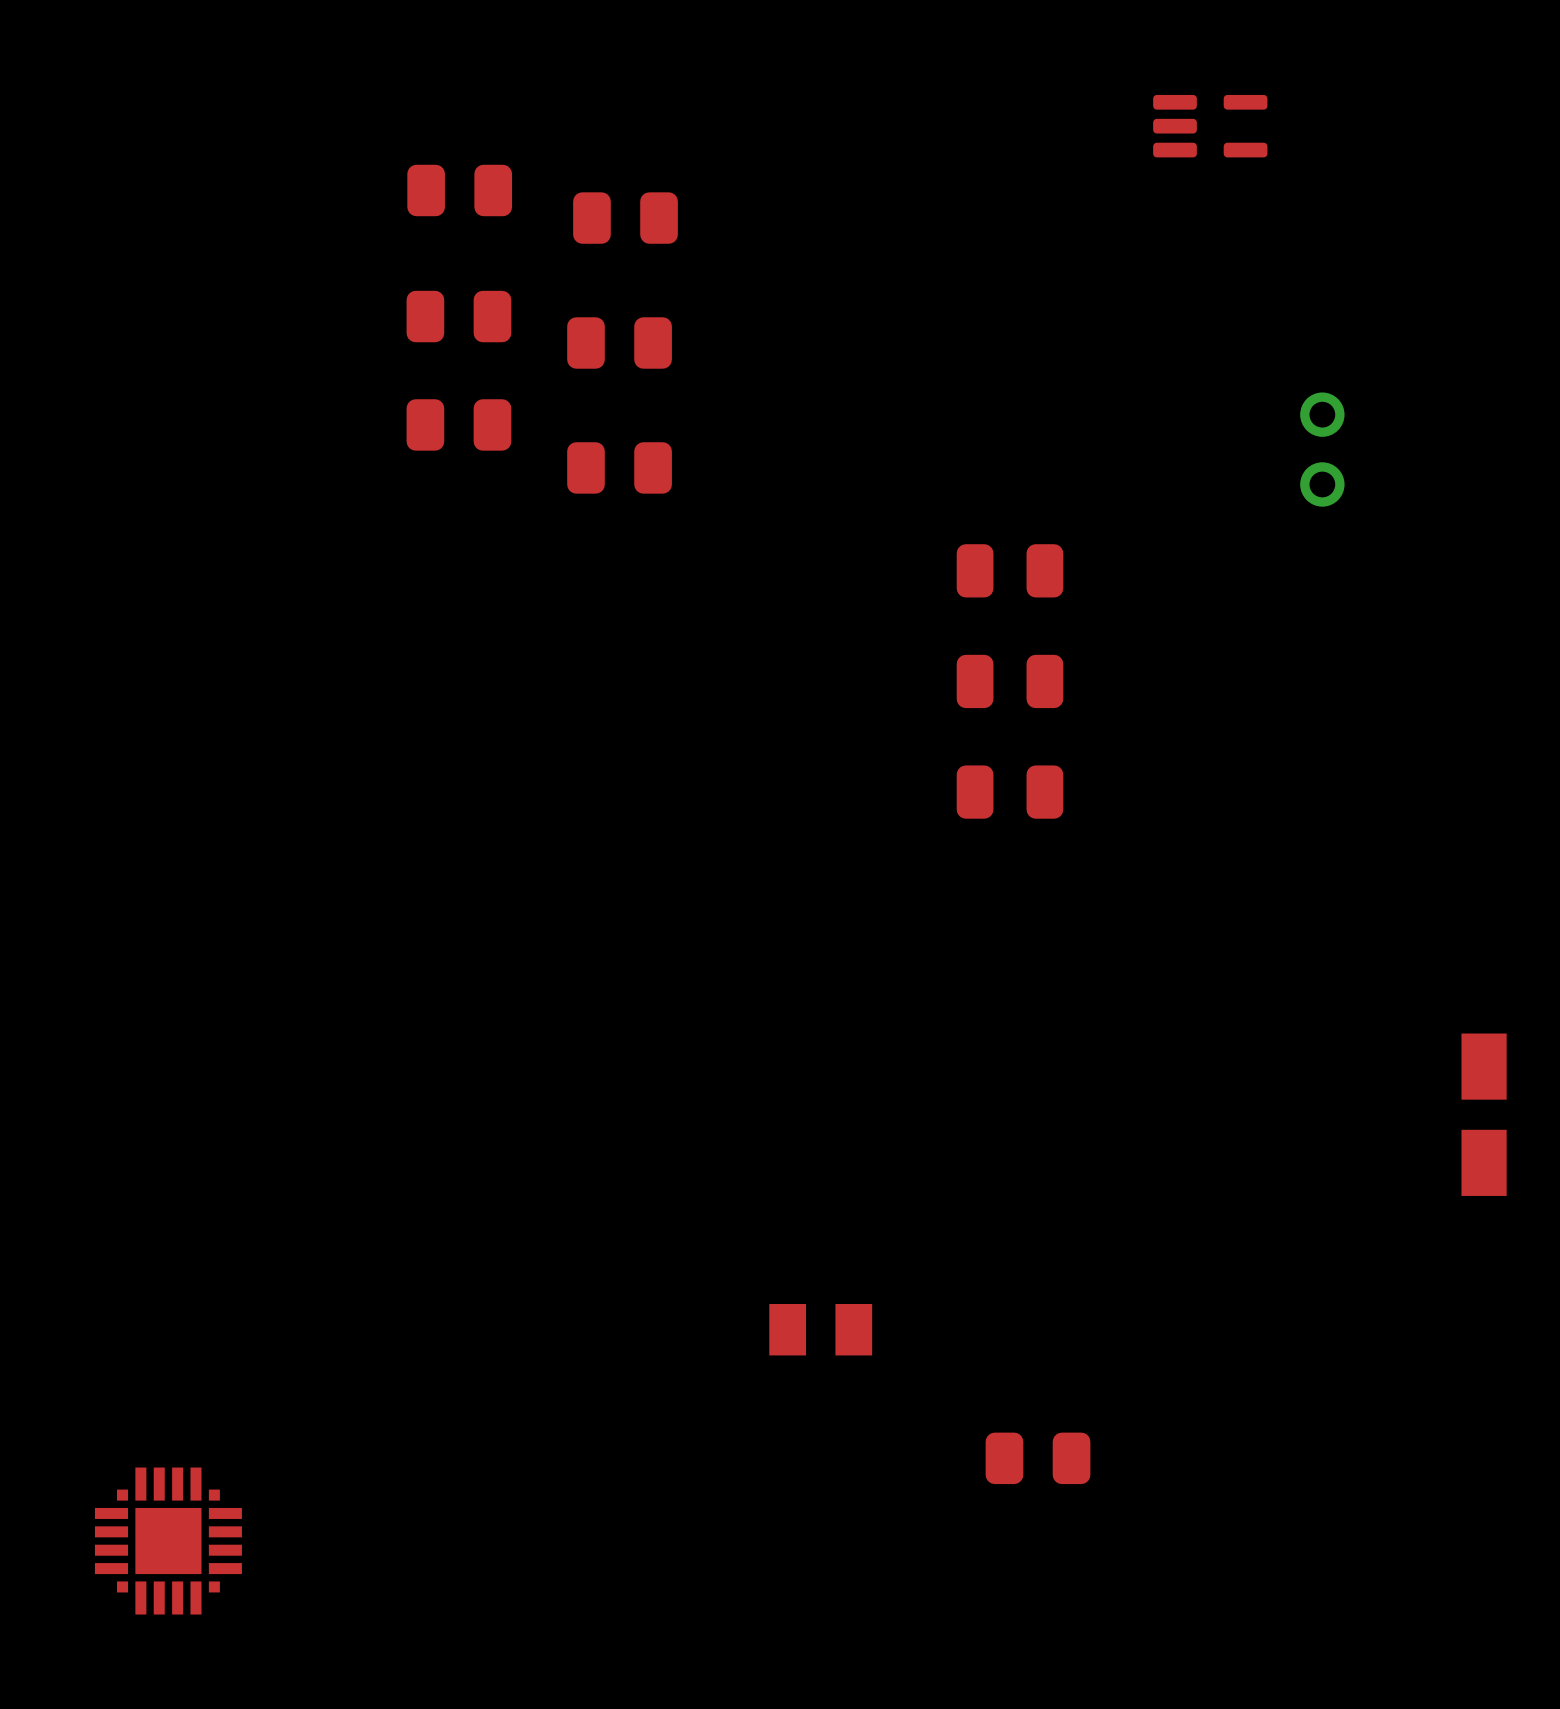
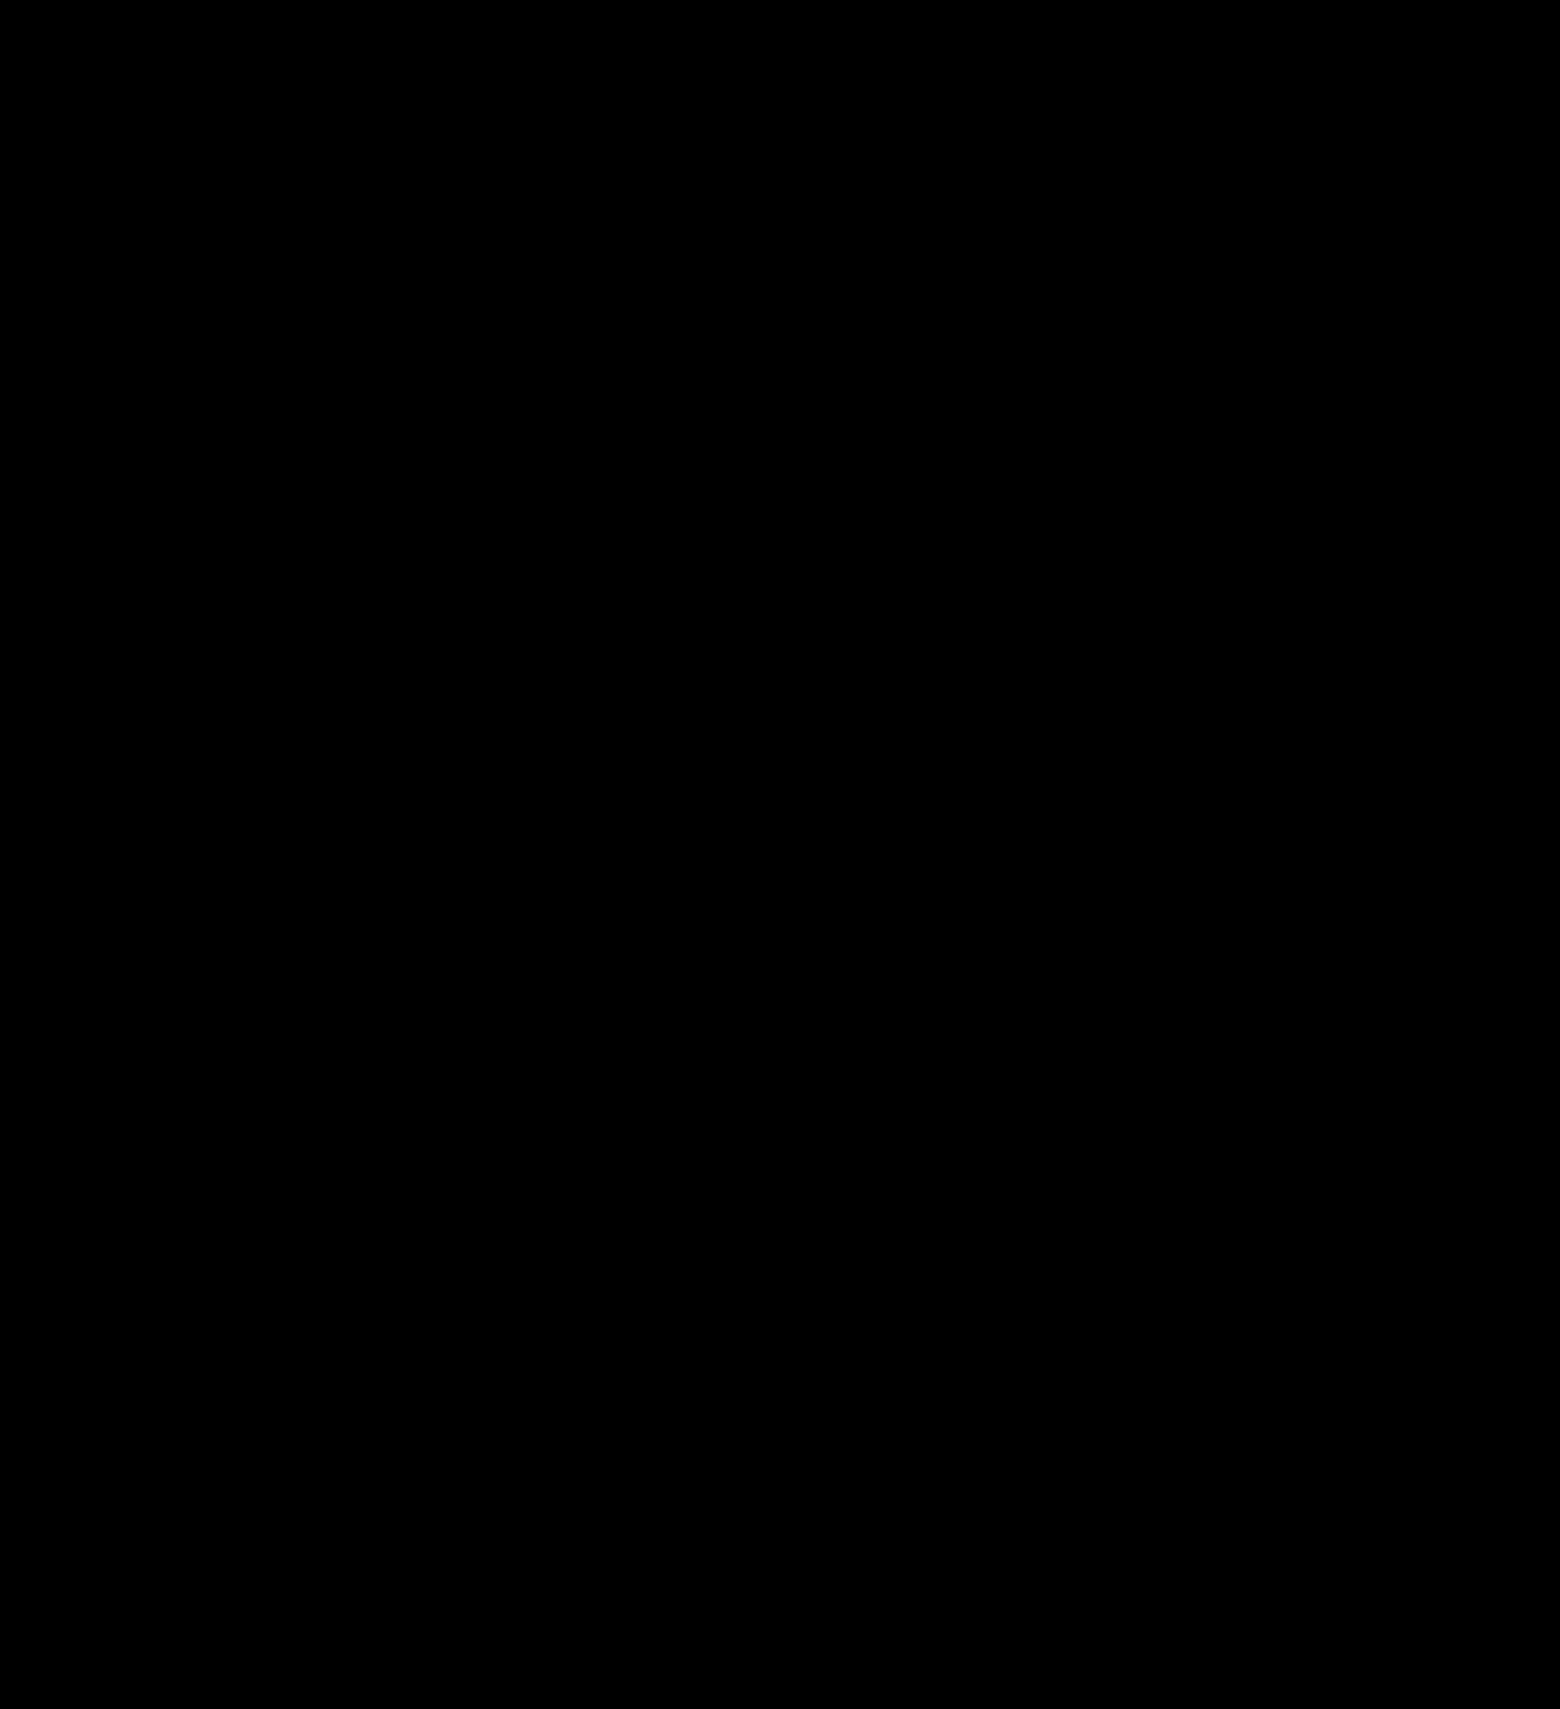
part: (1210, 126) -> none
part: (459, 190) -> none
part: (625, 218) -> none
part: (458, 316) -> none
part: (619, 342) -> none
part: (458, 424) -> none
part: (1322, 449) -> none
part: (619, 467) -> none
part: (1009, 570) -> none
part: (1009, 681) -> none
part: (1009, 792) -> none
part: (1484, 1114) -> none
part: (820, 1329) -> none
part: (1038, 1458) -> none
part: (168, 1541) -> none

